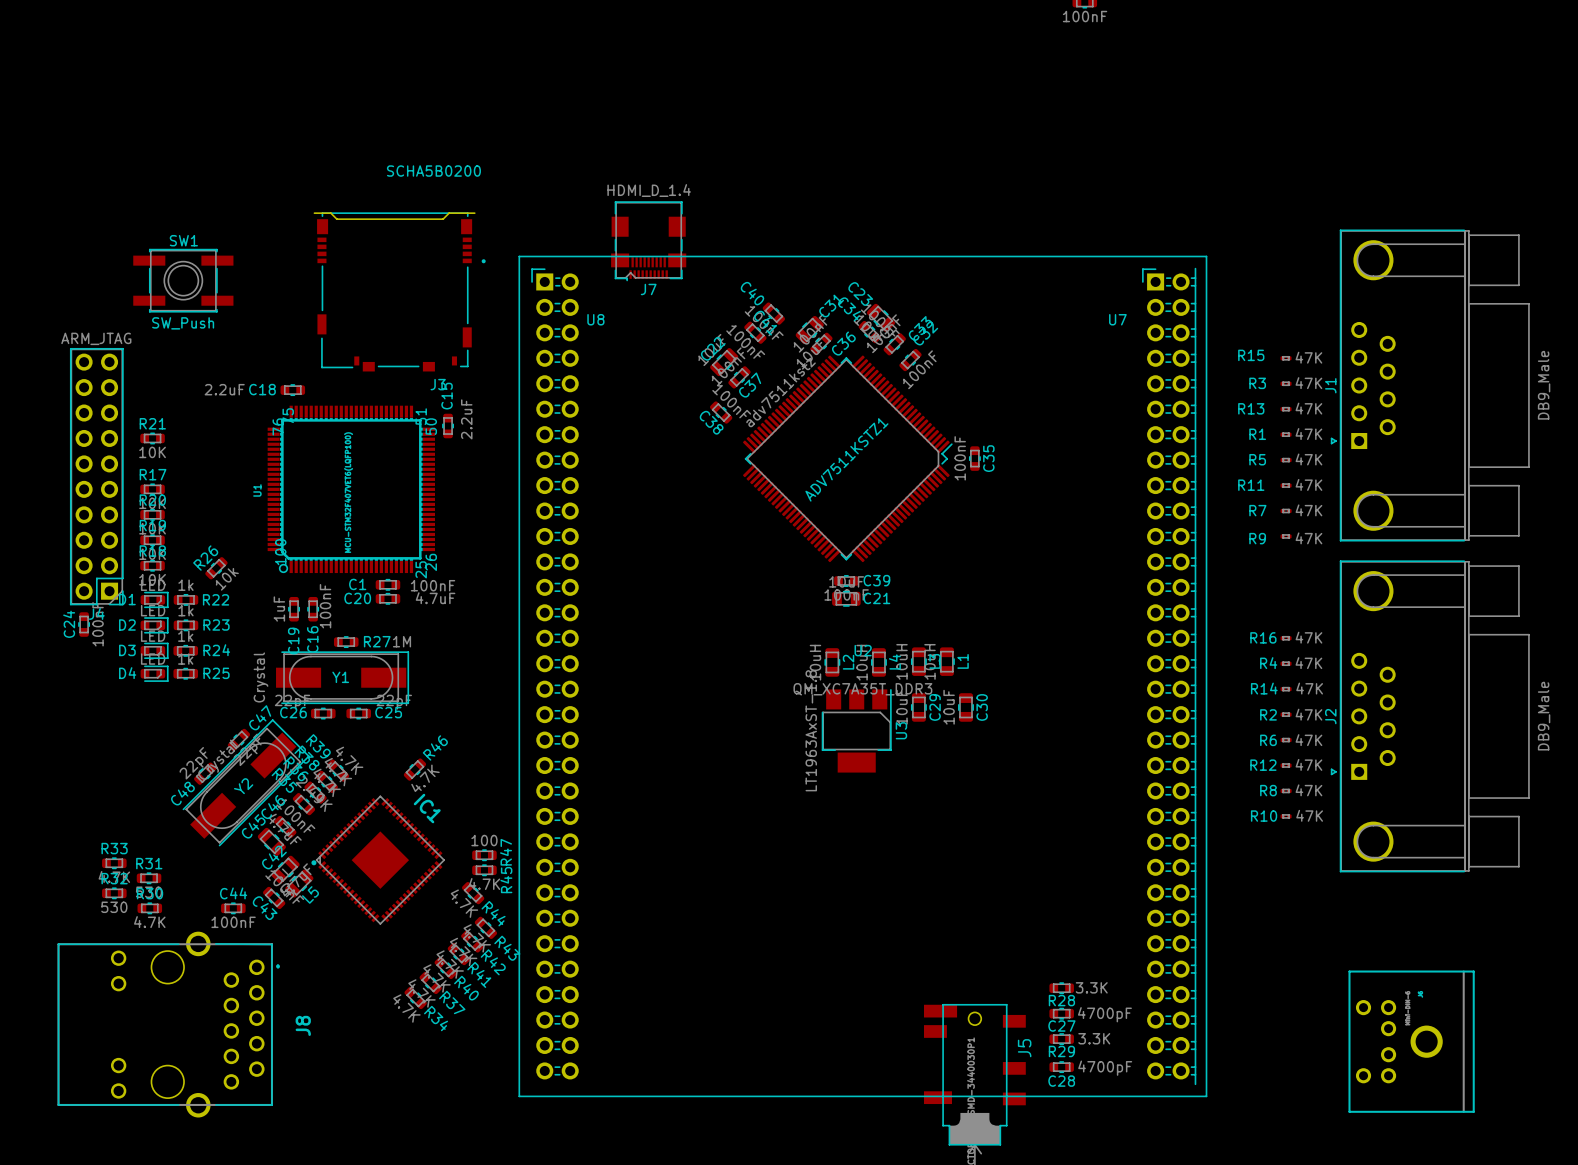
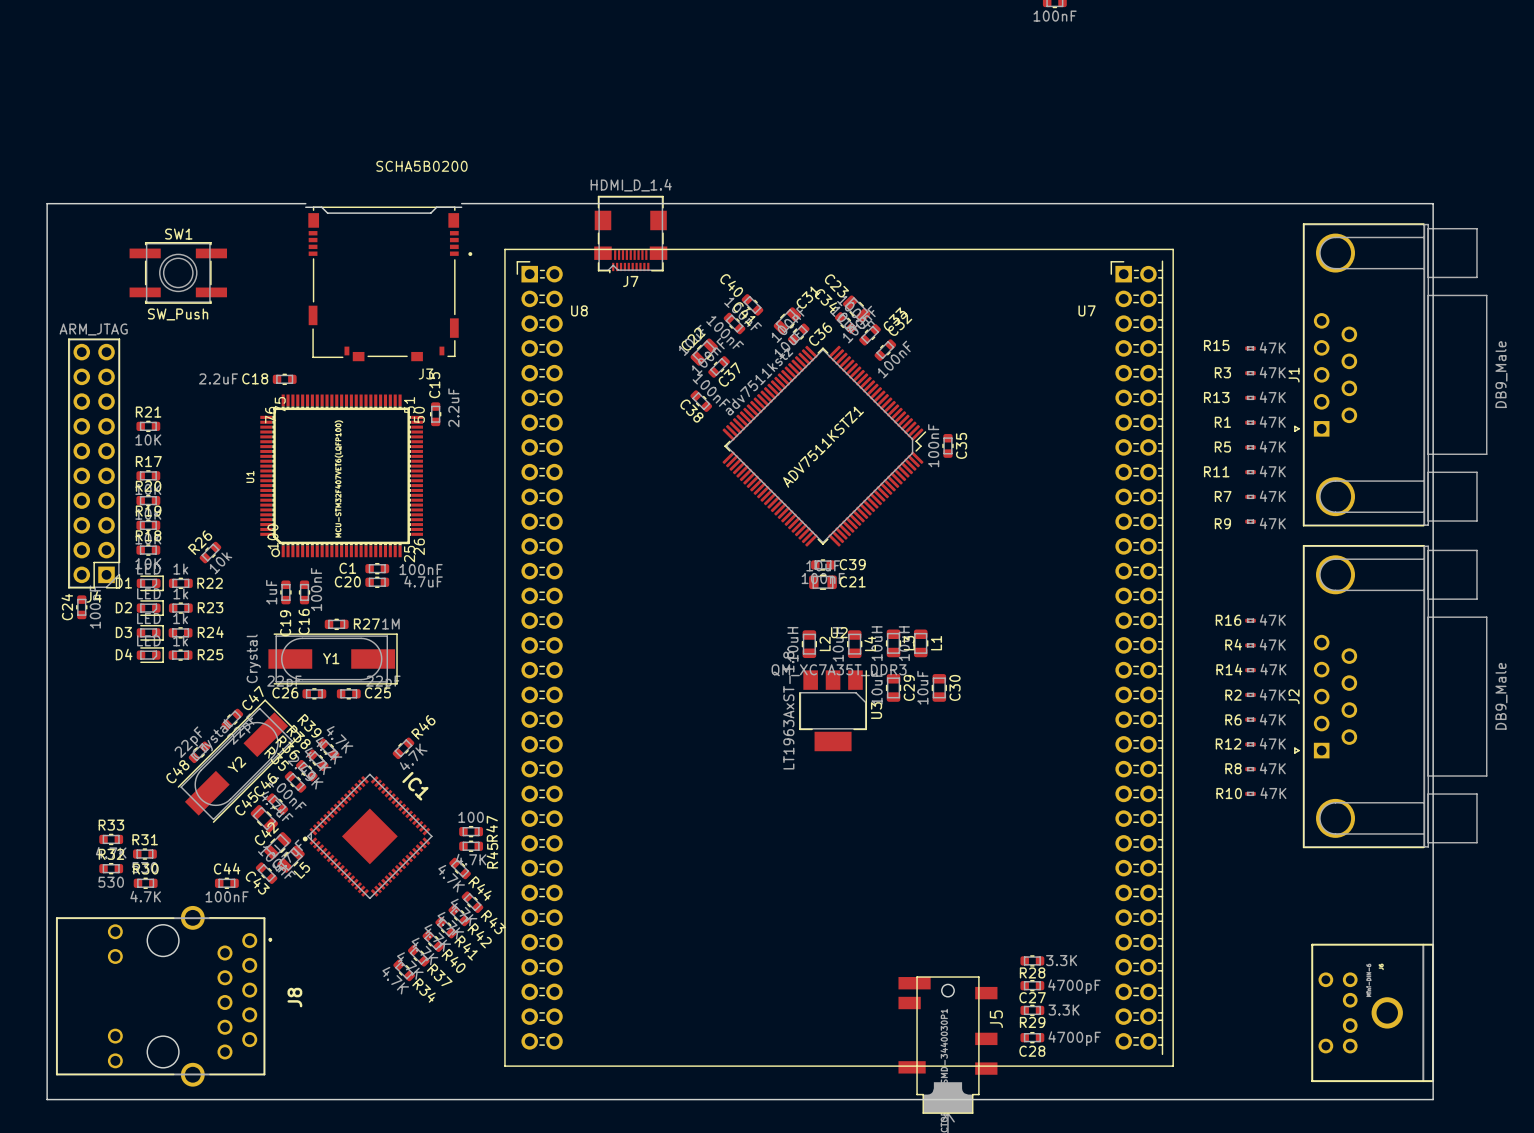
board edge: none -> (305, 203) (47, 203) (47, 1099) (1433, 1099) (1433, 203) (461, 203)

